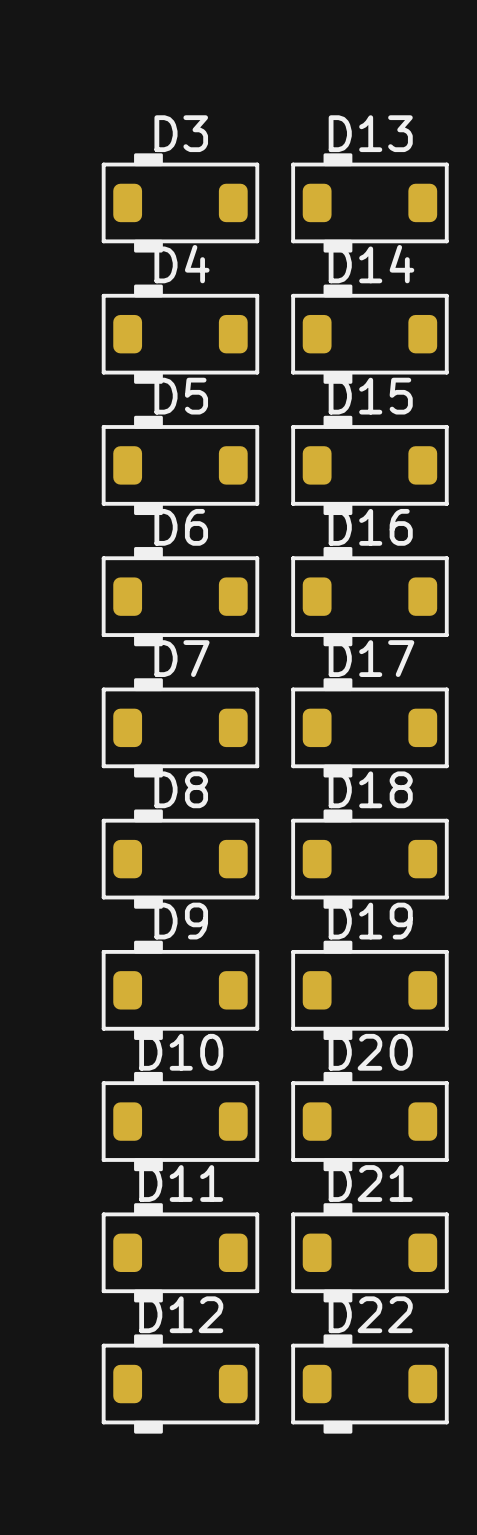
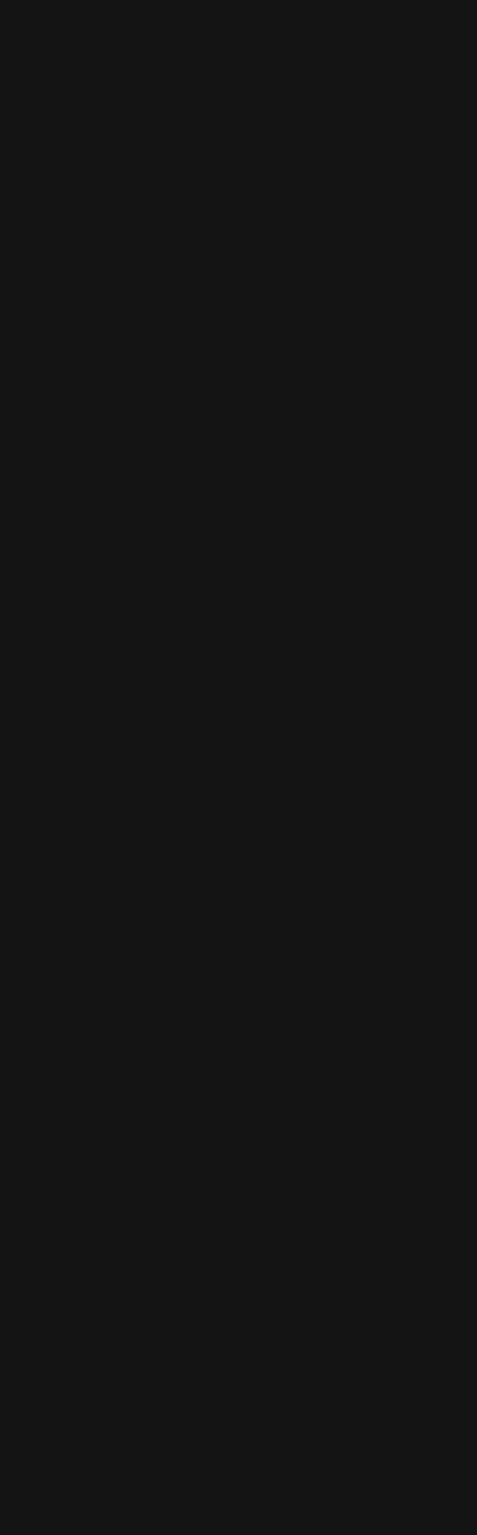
D3: (180, 202) -> none
D13: (369, 202) -> none
D4: (180, 334) -> none
D14: (369, 334) -> none
D5: (180, 465) -> none
D15: (369, 465) -> none
D6: (180, 596) -> none
D16: (369, 596) -> none
D7: (180, 727) -> none
D17: (369, 727) -> none
D8: (180, 859) -> none
D18: (369, 859) -> none
D9: (180, 990) -> none
D19: (369, 990) -> none
D10: (180, 1121) -> none
D20: (369, 1121) -> none
D11: (180, 1252) -> none
D21: (369, 1252) -> none
D12: (180, 1384) -> none
D22: (369, 1384) -> none

